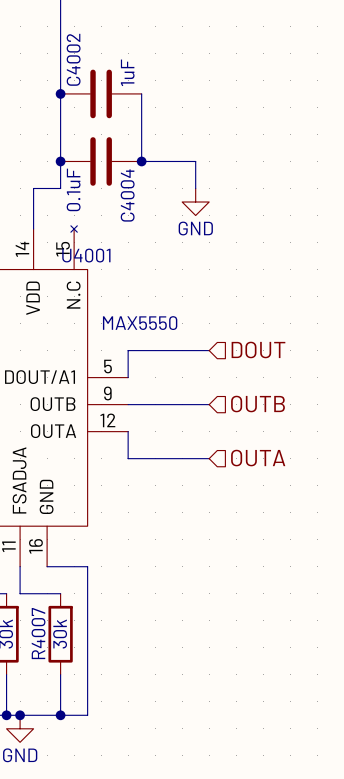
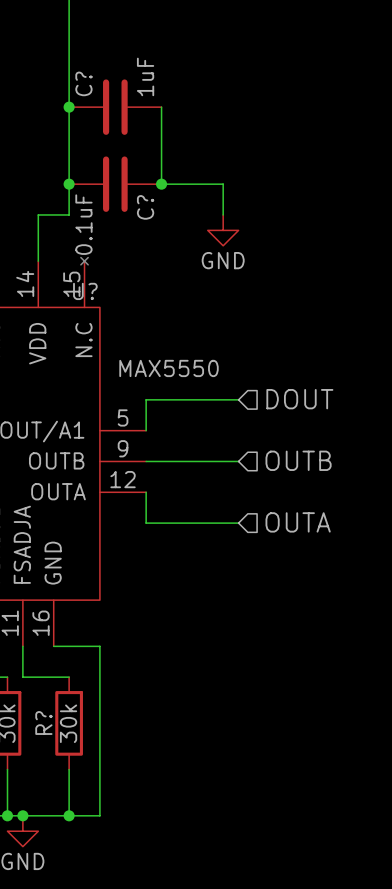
C4002 name: C4002 (73, 59) -> C? (83, 83)
C4004 name: C4004 (127, 195) -> C? (145, 207)
U4001 name: U4001 (86, 255) -> U? (85, 291)
R4007 name: R4007 (38, 633) -> R? (43, 723)

